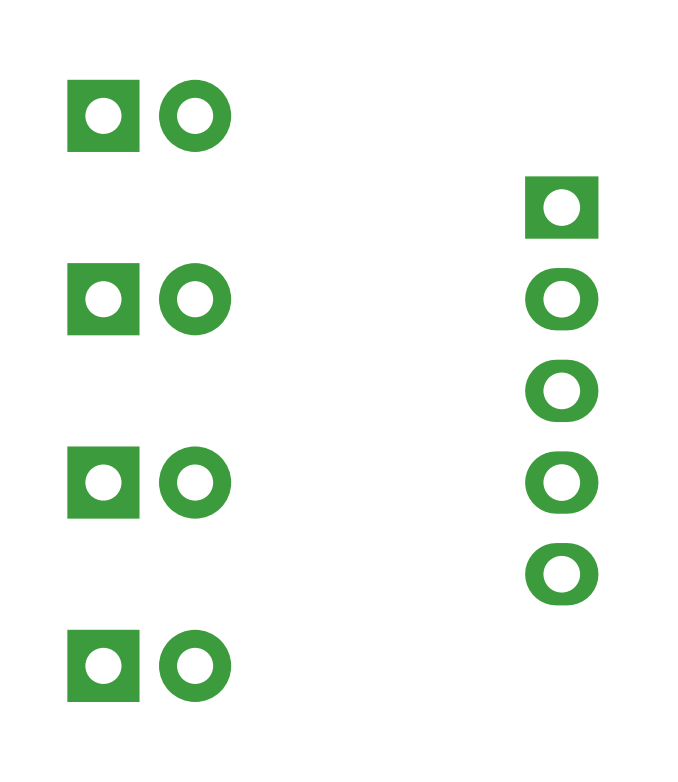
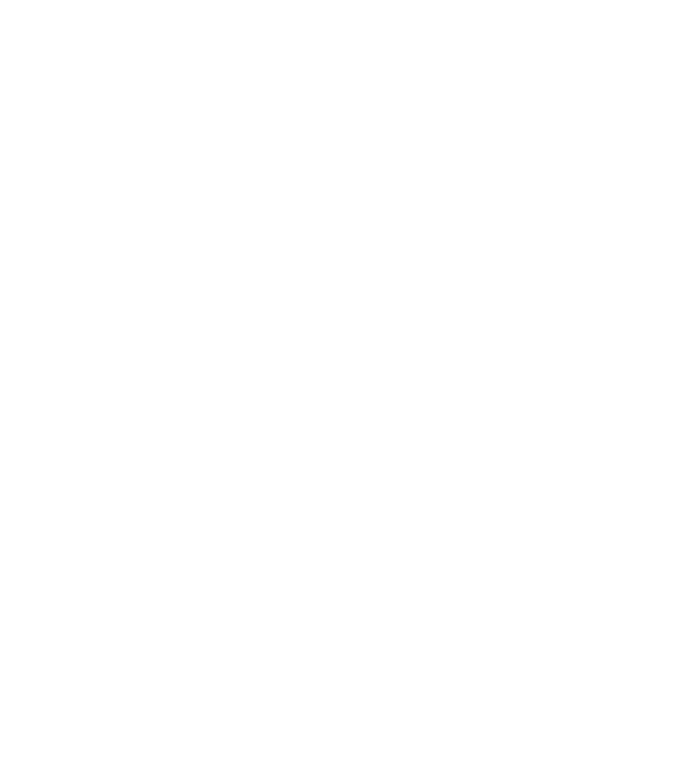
part: (149, 115) -> none
part: (149, 299) -> none
part: (561, 390) -> none
part: (149, 482) -> none
part: (149, 665) -> none

